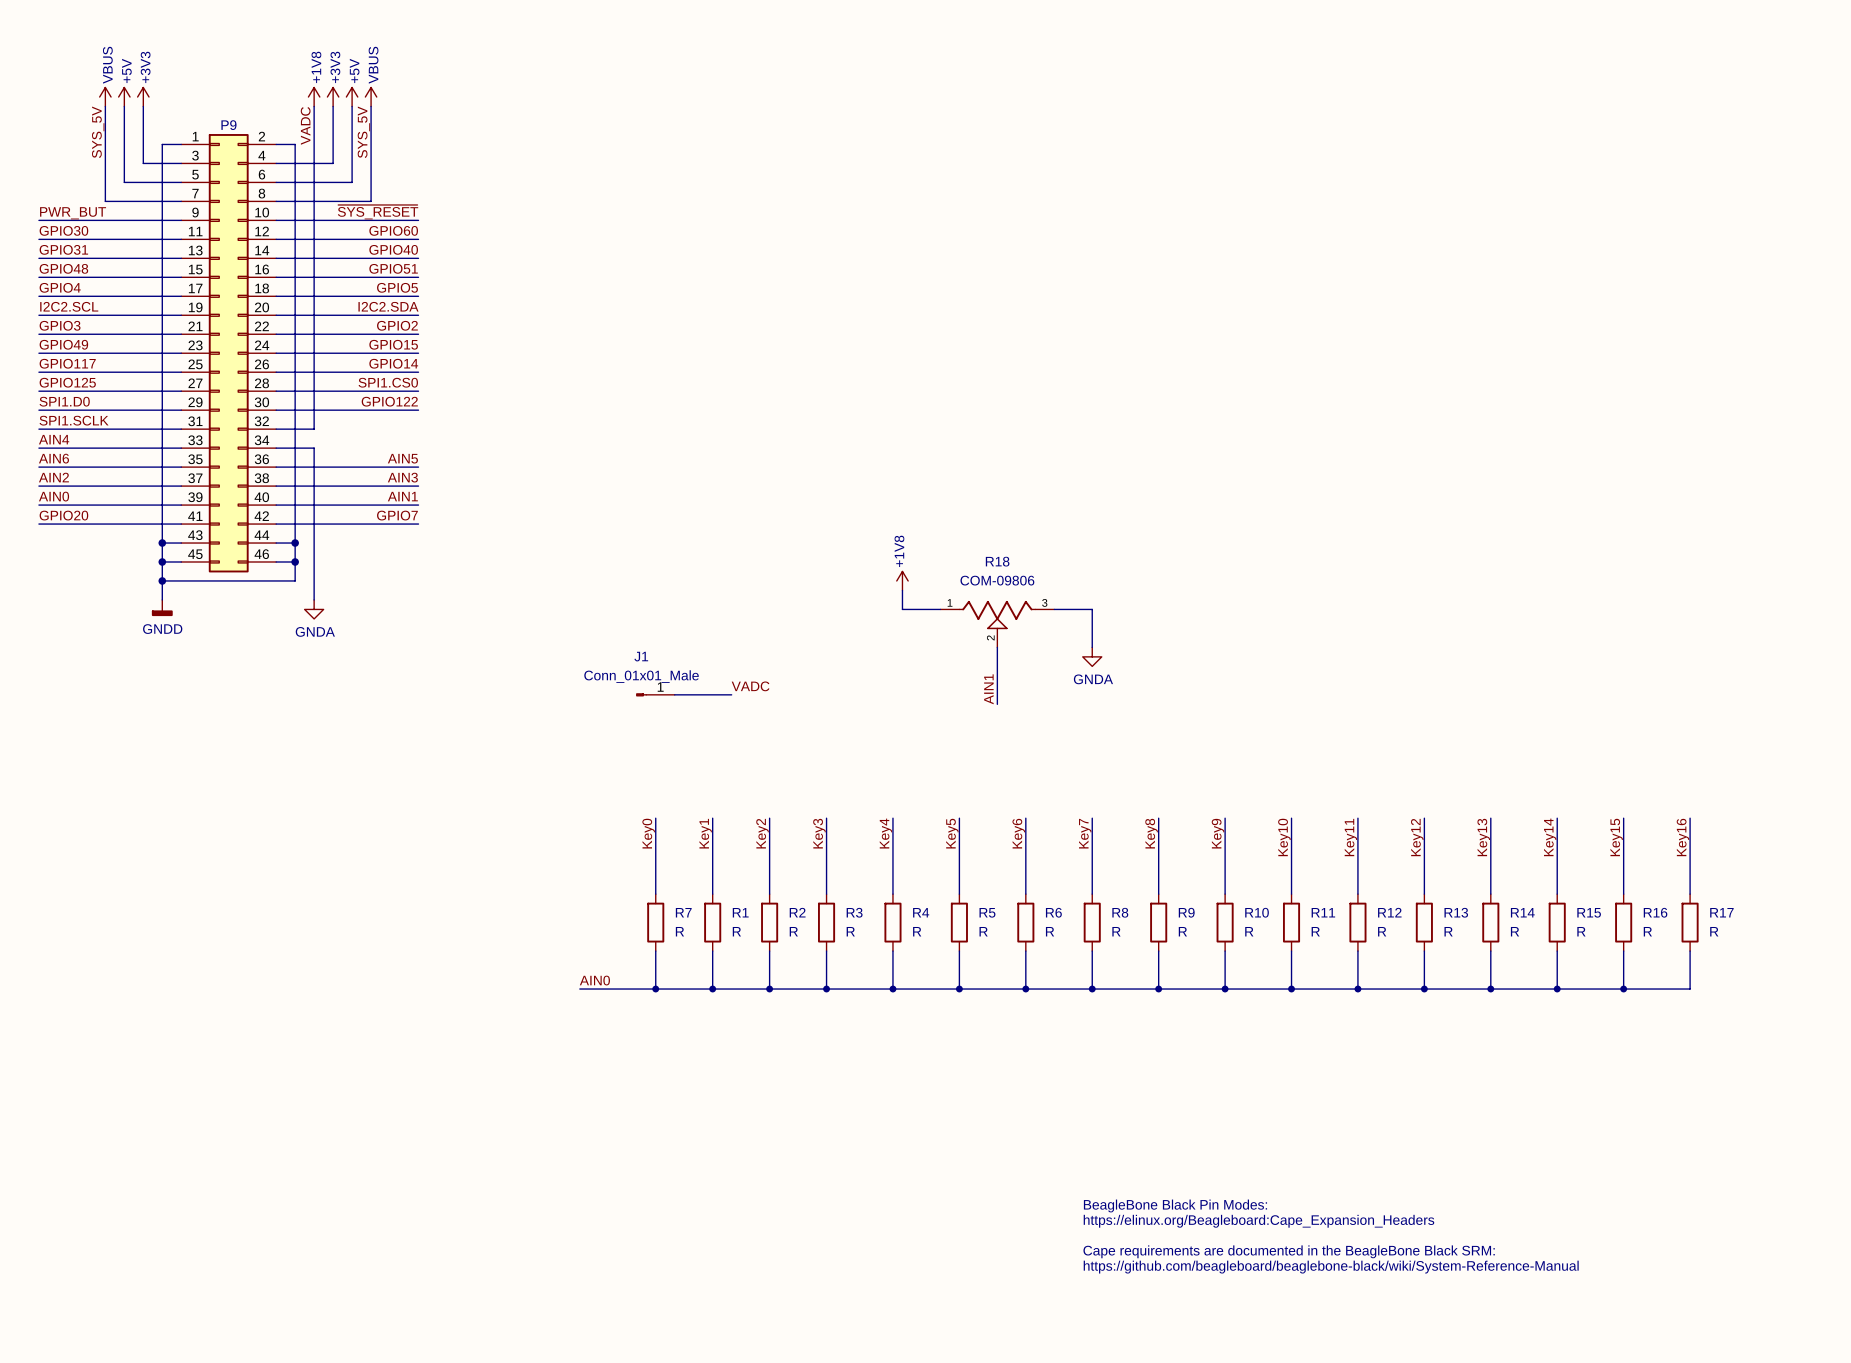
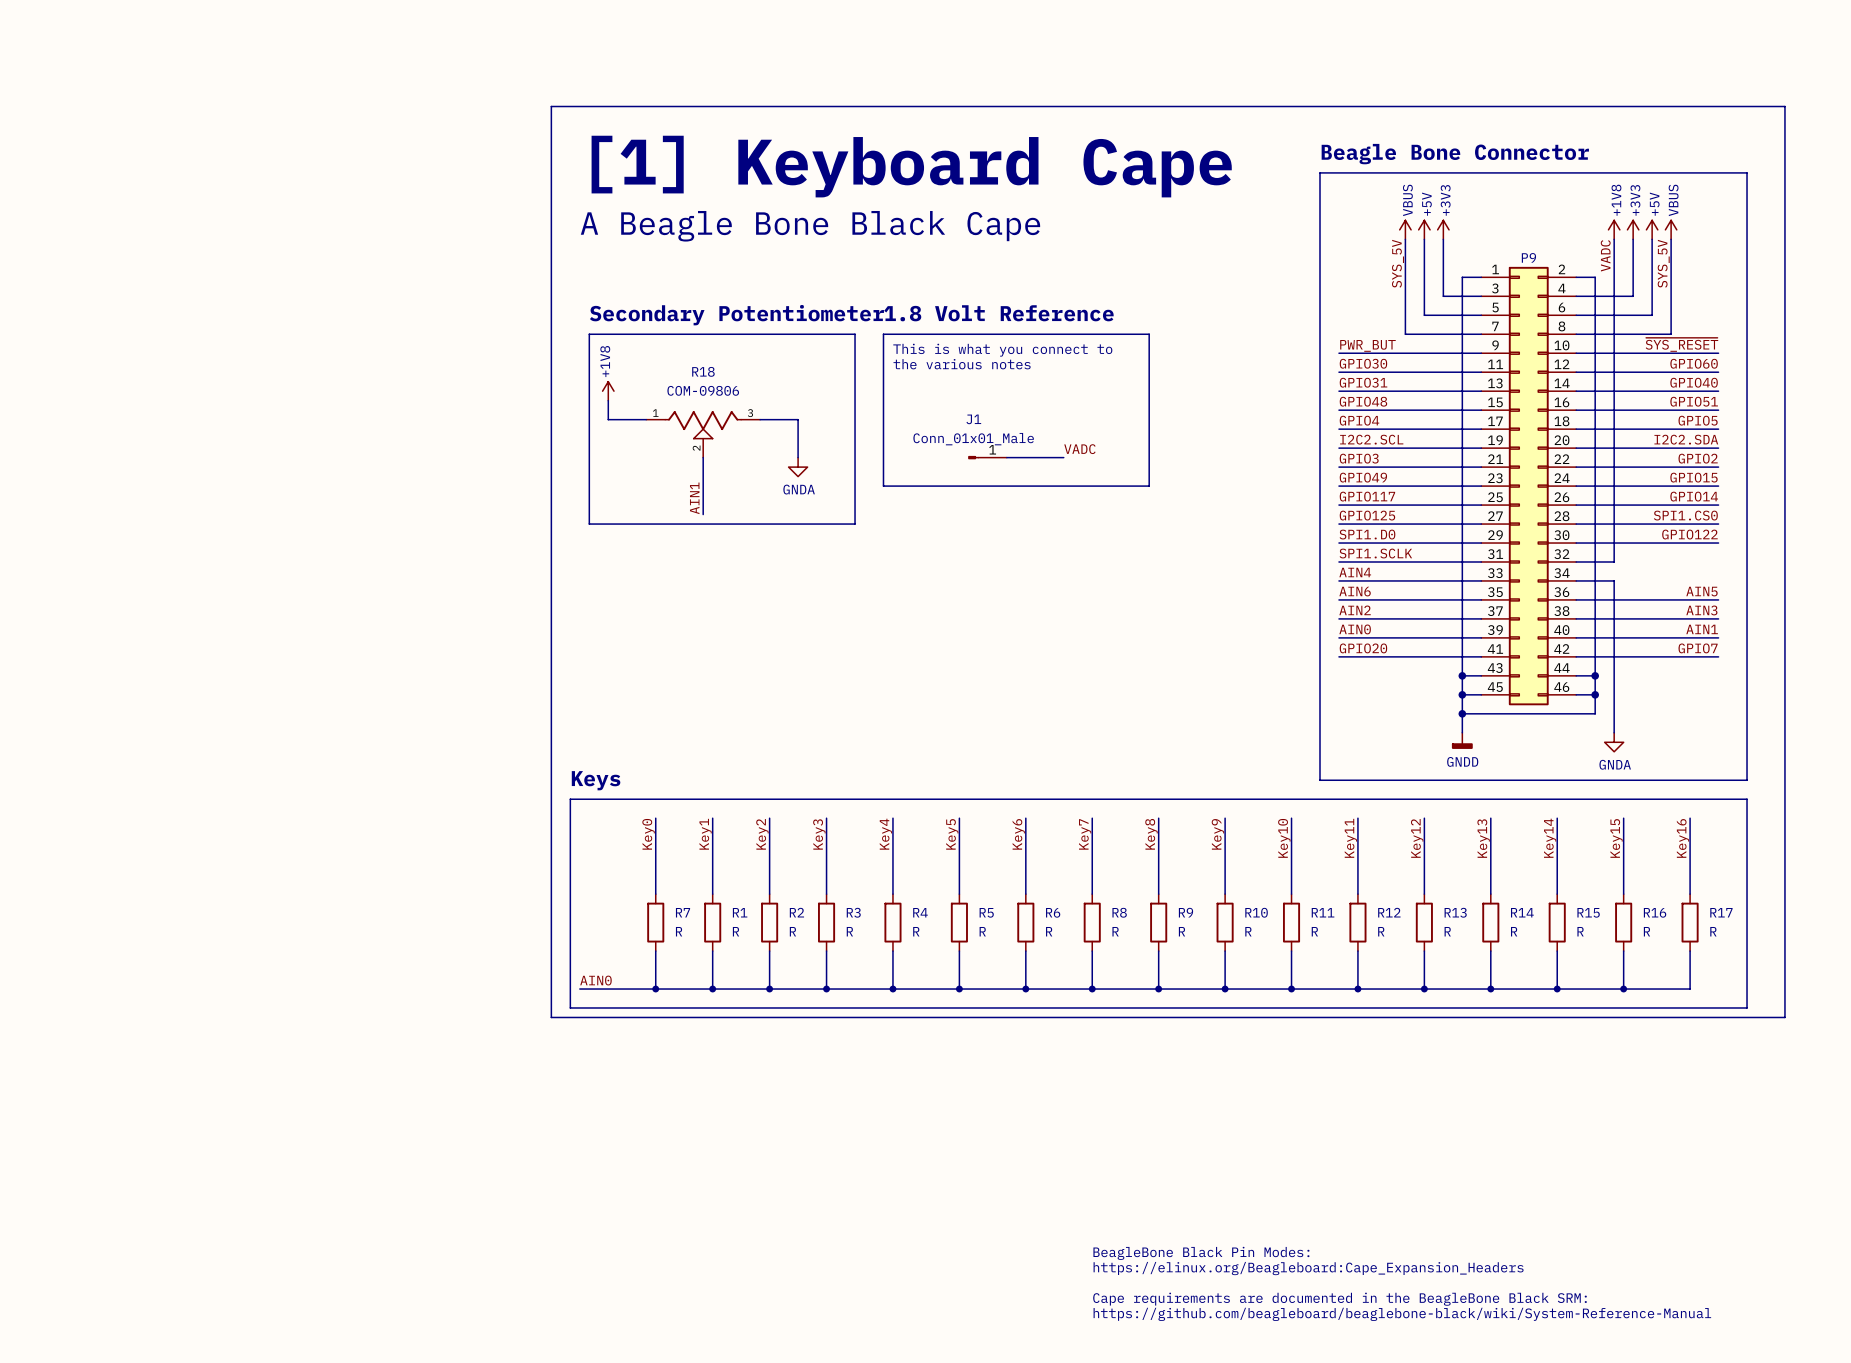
power symbol: VBUS (105, 97) -> none
power symbol: +5V (124, 97) -> none
power symbol: +3V3 (143, 97) -> none
power symbol: +1V8 (314, 97) -> none
power symbol: +3V3 (333, 97) -> none
power symbol: +5V (352, 97) -> none
power symbol: VBUS (371, 97) -> none
wire: (105, 106) (105, 201) (181, 201) -> none
wire: (124, 106) (124, 182) (181, 182) -> none
wire: (143, 106) (143, 163) (181, 163) -> none
wire: (314, 106) (314, 429) (276, 429) -> none
wire: (333, 106) (333, 163) (276, 163) -> none
wire: (352, 106) (352, 182) (276, 182) -> none
wire: (371, 106) (371, 201) (276, 201) -> none
line: none -> (551, 106) (1784, 106) (1784, 1017) (551, 1017) (551, 106)
label: VADC (305, 125) -> none
label: SYS_5V (98, 132) -> none
label: SYS_5V (363, 132) -> none
wire: (181, 144) (162, 144) (162, 599) -> none
wire: (276, 144) (295, 144) (295, 580) (162, 580) -> none
text: none -> Beagle Bone Connector (1455, 154)
text: none -> [1] Keyboard Cape (911, 166)
line: none -> (1319, 172) (1747, 172) (1747, 780) (1319, 780) (1319, 172)
label: ~{SYS_RESET} (378, 212) -> none
label: PWR_BUT (73, 213) -> none
wire: (38, 220) (181, 220) -> none
wire: (276, 220) (418, 220) -> none
text: none -> A Beagle Bone Black Cape (810, 226)
power symbol: none -> VBUS (1405, 229)
power symbol: none -> +5V (1424, 229)
power symbol: none -> +3V3 (1443, 229)
power symbol: none -> +1V8 (1614, 229)
power symbol: none -> +3V3 (1633, 229)
power symbol: none -> +5V (1652, 229)
power symbol: none -> VBUS (1671, 229)
label: GPIO30 (63, 230) -> none
label: GPIO60 (393, 230) -> none
wire: (38, 239) (181, 239) -> none
wire: (276, 239) (418, 239) -> none
wire: none -> (1405, 239) (1405, 334) (1481, 334)
wire: none -> (1424, 239) (1424, 315) (1481, 315)
wire: none -> (1443, 239) (1443, 296) (1481, 296)
wire: none -> (1614, 239) (1614, 561) (1576, 561)
wire: none -> (1633, 239) (1633, 296) (1576, 296)
wire: none -> (1652, 239) (1652, 315) (1576, 315)
wire: none -> (1671, 239) (1671, 334) (1576, 334)
label: GPIO31 (63, 249) -> none
label: GPIO40 (393, 249) -> none
wire: (38, 258) (181, 258) -> none
wire: (276, 258) (418, 258) -> none
label: none -> VADC (1605, 255)
label: none -> SYS_5V (1397, 263)
label: none -> SYS_5V (1663, 263)
label: GPIO48 (63, 268) -> none
label: GPIO51 (393, 268) -> none
wire: (38, 277) (181, 277) -> none
wire: (276, 277) (418, 277) -> none
wire: none -> (1481, 277) (1462, 277) (1462, 732)
wire: none -> (1576, 277) (1595, 277) (1595, 713) (1462, 713)
label: GPIO4 (60, 287) -> none
label: GPIO5 (397, 287) -> none
wire: (38, 296) (181, 296) -> none
wire: (276, 296) (418, 296) -> none
label: I2C2.SCL (69, 306) -> none
label: I2C2.SDA (388, 306) -> none
text: none -> 1.8 Volt Reference (998, 313)
wire: (38, 315) (181, 315) -> none
wire: (276, 315) (418, 315) -> none
text: none -> Secondary Potentiometer (736, 315)
label: GPIO3 (60, 325) -> none
label: GPIO2 (397, 325) -> none
wire: (38, 334) (181, 334) -> none
wire: (276, 334) (418, 334) -> none
line: none -> (589, 334) (855, 334) (855, 524) (589, 524) (589, 334)
line: none -> (883, 334) (1149, 334) (1149, 486) (883, 486) (883, 334)
label: GPIO49 (63, 344) -> none
label: GPIO15 (393, 344) -> none
label: none -> ~{SYS_RESET} (1681, 344)
label: none -> PWR_BUT (1367, 345)
text: none -> This is what you connect to (1002, 350)
wire: (38, 353) (181, 353) -> none
P9 position: (228, 353) -> (1528, 486)
wire: (276, 353) (418, 353) -> none
wire: none -> (1338, 353) (1481, 353)
wire: none -> (1576, 353) (1718, 353)
label: GPIO117 (67, 363) -> none
label: GPIO14 (393, 363) -> none
label: none -> GPIO30 (1363, 363)
label: none -> GPIO60 (1694, 363)
text: none -> the various notes (962, 364)
wire: (38, 372) (181, 372) -> none
wire: (276, 372) (418, 372) -> none
wire: none -> (1338, 372) (1481, 372)
wire: none -> (1576, 372) (1718, 372)
label: GPIO125 (67, 382) -> none
label: SPI1.CS0 (388, 382) -> none
label: none -> GPIO31 (1363, 382)
label: none -> GPIO40 (1694, 382)
wire: (38, 391) (181, 391) -> none
wire: (276, 391) (418, 391) -> none
power symbol: none -> +1V8 (608, 391)
wire: none -> (1338, 391) (1481, 391)
wire: none -> (1576, 391) (1718, 391)
wire: none -> (608, 400) (608, 419) (646, 419)
label: SPI1.D0 (64, 401) -> none
label: GPIO122 (389, 401) -> none
label: none -> GPIO48 (1363, 401)
label: none -> GPIO51 (1694, 401)
wire: (38, 410) (181, 410) -> none
wire: (276, 410) (418, 410) -> none
wire: none -> (1338, 410) (1481, 410)
wire: none -> (1576, 410) (1718, 410)
wire: none -> (760, 419) (798, 419) (798, 457)
label: SPI1.SCLK (74, 420) -> none
label: none -> GPIO4 (1359, 420)
label: none -> GPIO5 (1698, 420)
wire: (38, 429) (181, 429) -> none
wire: none -> (1338, 429) (1481, 429)
wire: none -> (1576, 429) (1718, 429)
label: AIN4 (54, 439) -> none
label: none -> I2C2.SCL (1371, 439)
label: none -> I2C2.SDA (1686, 439)
wire: (38, 448) (181, 448) -> none
wire: (276, 448) (314, 448) (314, 599) -> none
wire: none -> (1338, 448) (1481, 448)
wire: none -> (1576, 448) (1718, 448)
label: none -> VADC (1079, 449)
wire: none -> (703, 457) (703, 514)
wire: none -> (1006, 457) (1063, 457)
label: AIN6 (53, 458) -> none
label: AIN5 (402, 458) -> none
label: none -> GPIO3 (1359, 458)
label: none -> GPIO2 (1698, 458)
wire: (38, 467) (181, 467) -> none
wire: (276, 467) (418, 467) -> none
power symbol: none -> GNDA (798, 467)
wire: none -> (1338, 467) (1481, 467)
wire: none -> (1576, 467) (1718, 467)
label: AIN2 (53, 477) -> none
label: AIN3 (402, 477) -> none
label: none -> GPIO49 (1363, 477)
label: none -> GPIO15 (1694, 477)
wire: (38, 486) (181, 486) -> none
wire: (276, 486) (418, 486) -> none
wire: none -> (1338, 486) (1481, 486)
wire: none -> (1576, 486) (1718, 486)
label: AIN0 (54, 496) -> none
label: AIN1 (402, 496) -> none
label: none -> GPIO117 (1367, 496)
label: none -> GPIO14 (1694, 496)
label: none -> AIN1 (694, 498)
wire: (38, 505) (181, 505) -> none
wire: (276, 505) (418, 505) -> none
wire: none -> (1338, 505) (1481, 505)
wire: none -> (1576, 505) (1718, 505)
label: GPIO20 (63, 515) -> none
label: GPIO7 (397, 515) -> none
label: none -> GPIO125 (1367, 515)
label: none -> SPI1.CS0 (1685, 515)
wire: (38, 524) (181, 524) -> none
wire: (276, 524) (418, 524) -> none
wire: none -> (1338, 524) (1481, 524)
wire: none -> (1576, 524) (1718, 524)
label: none -> SPI1.D0 (1367, 534)
label: none -> GPIO122 (1689, 534)
wire: (162, 543) (181, 543) -> none
junction: (162, 543) -> none
wire: (276, 543) (295, 543) -> none
junction: (295, 543) -> none
wire: none -> (1338, 543) (1481, 543)
wire: none -> (1576, 543) (1718, 543)
label: none -> SPI1.SCLK (1375, 553)
wire: (162, 561) (181, 561) -> none
junction: (162, 561) -> none
wire: (276, 561) (295, 561) -> none
junction: (295, 561) -> none
wire: none -> (1338, 561) (1481, 561)
label: none -> AIN4 (1355, 572)
junction: (162, 580) -> none
power symbol: +1V8 (902, 580) -> none
wire: none -> (1338, 580) (1481, 580)
wire: none -> (1576, 580) (1614, 580) (1614, 732)
wire: (902, 590) (902, 609) (940, 609) -> none
label: none -> AIN6 (1355, 591)
label: none -> AIN5 (1701, 591)
wire: none -> (1338, 599) (1481, 599)
wire: none -> (1576, 599) (1718, 599)
power symbol: GNDD (162, 608) -> none
power symbol: GNDA (314, 609) -> none
wire: (1054, 609) (1092, 609) (1092, 647) -> none
label: none -> AIN2 (1355, 610)
label: none -> AIN3 (1701, 610)
wire: none -> (1338, 618) (1481, 618)
wire: none -> (1576, 618) (1718, 618)
R18 position: (997, 624) -> (703, 434)
label: none -> AIN0 (1355, 629)
label: none -> AIN1 (1702, 629)
wire: none -> (1338, 637) (1481, 637)
wire: none -> (1576, 637) (1718, 637)
wire: (997, 647) (997, 704) -> none
label: none -> GPIO20 (1363, 648)
label: none -> GPIO7 (1698, 648)
power symbol: GNDA (1092, 656) -> none
wire: none -> (1338, 656) (1481, 656)
wire: none -> (1576, 656) (1718, 656)
wire: none -> (1462, 675) (1481, 675)
junction: none -> (1462, 675)
wire: none -> (1576, 675) (1595, 675)
junction: none -> (1595, 675)
label: VADC (750, 686) -> none
label: AIN1 (988, 689) -> none
J1 position: (655, 694) -> (987, 457)
wire: (674, 694) (731, 694) -> none
wire: none -> (1462, 694) (1481, 694)
junction: none -> (1462, 694)
wire: none -> (1576, 694) (1595, 694)
junction: none -> (1595, 694)
junction: none -> (1462, 713)
power symbol: none -> GNDD (1462, 740)
power symbol: none -> GNDA (1614, 742)
text: none -> Keys (596, 780)
line: none -> (570, 799) (1747, 799) (1747, 1007) (570, 1007) (570, 799)
text position: BeagleBone Black Pin Modes: (1175, 1205) -> BeagleBone Black Pin Modes: (1201, 1253)
text position: https://elinux.org/Beagleboard:Cape_Expansion_Headers (1258, 1221) -> https://elinux.org/Beagleboard:Cape_Expansion_Headers (1308, 1268)
text position: Cape requirements are documented in the BeagleBone Black SRM: (1289, 1251) -> Cape requirements are documented in the BeagleBone Black SRM: (1339, 1299)
text position: https://github.com/beagleboard/beaglebone-black/wiki/System-Reference-Manual (1331, 1267) -> https://github.com/beagleboard/beaglebone-black/wiki/System-Reference-Manual (1402, 1314)

